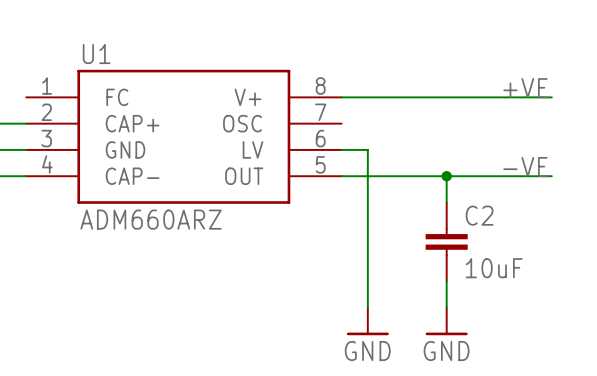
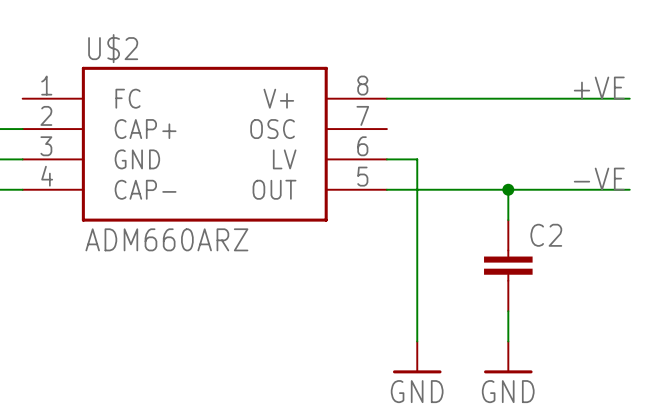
U1 name: U1 (96, 54) -> U$2 (113, 48)
C2 value: 10uF (494, 268) -> none

